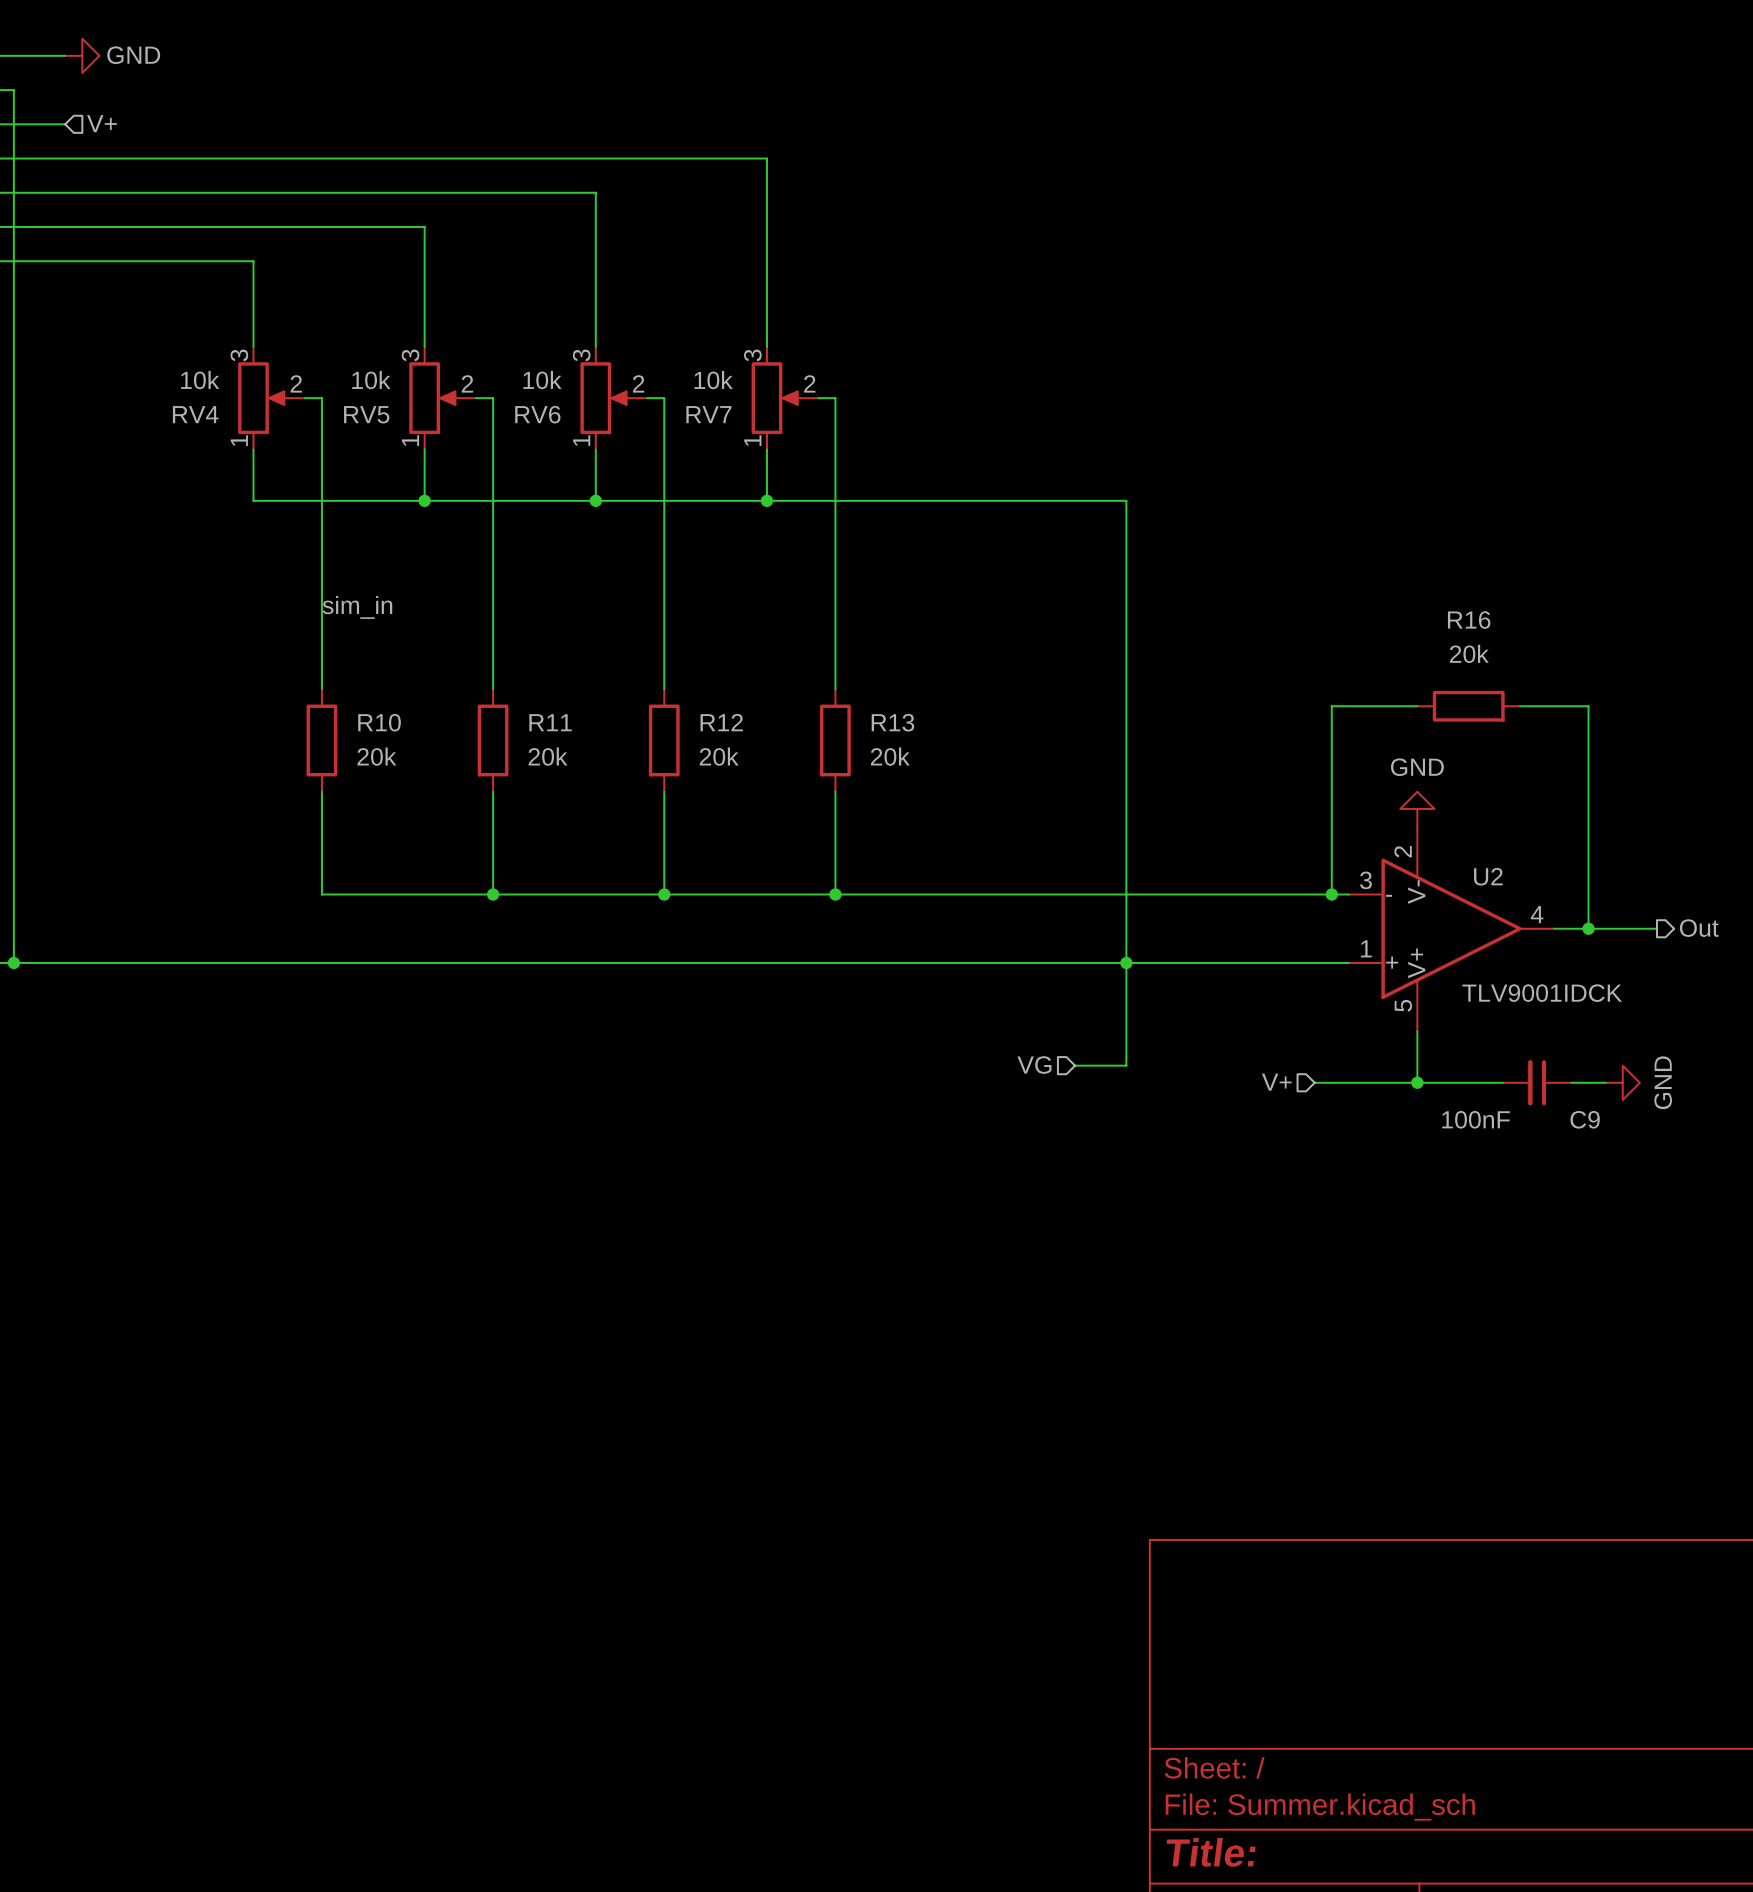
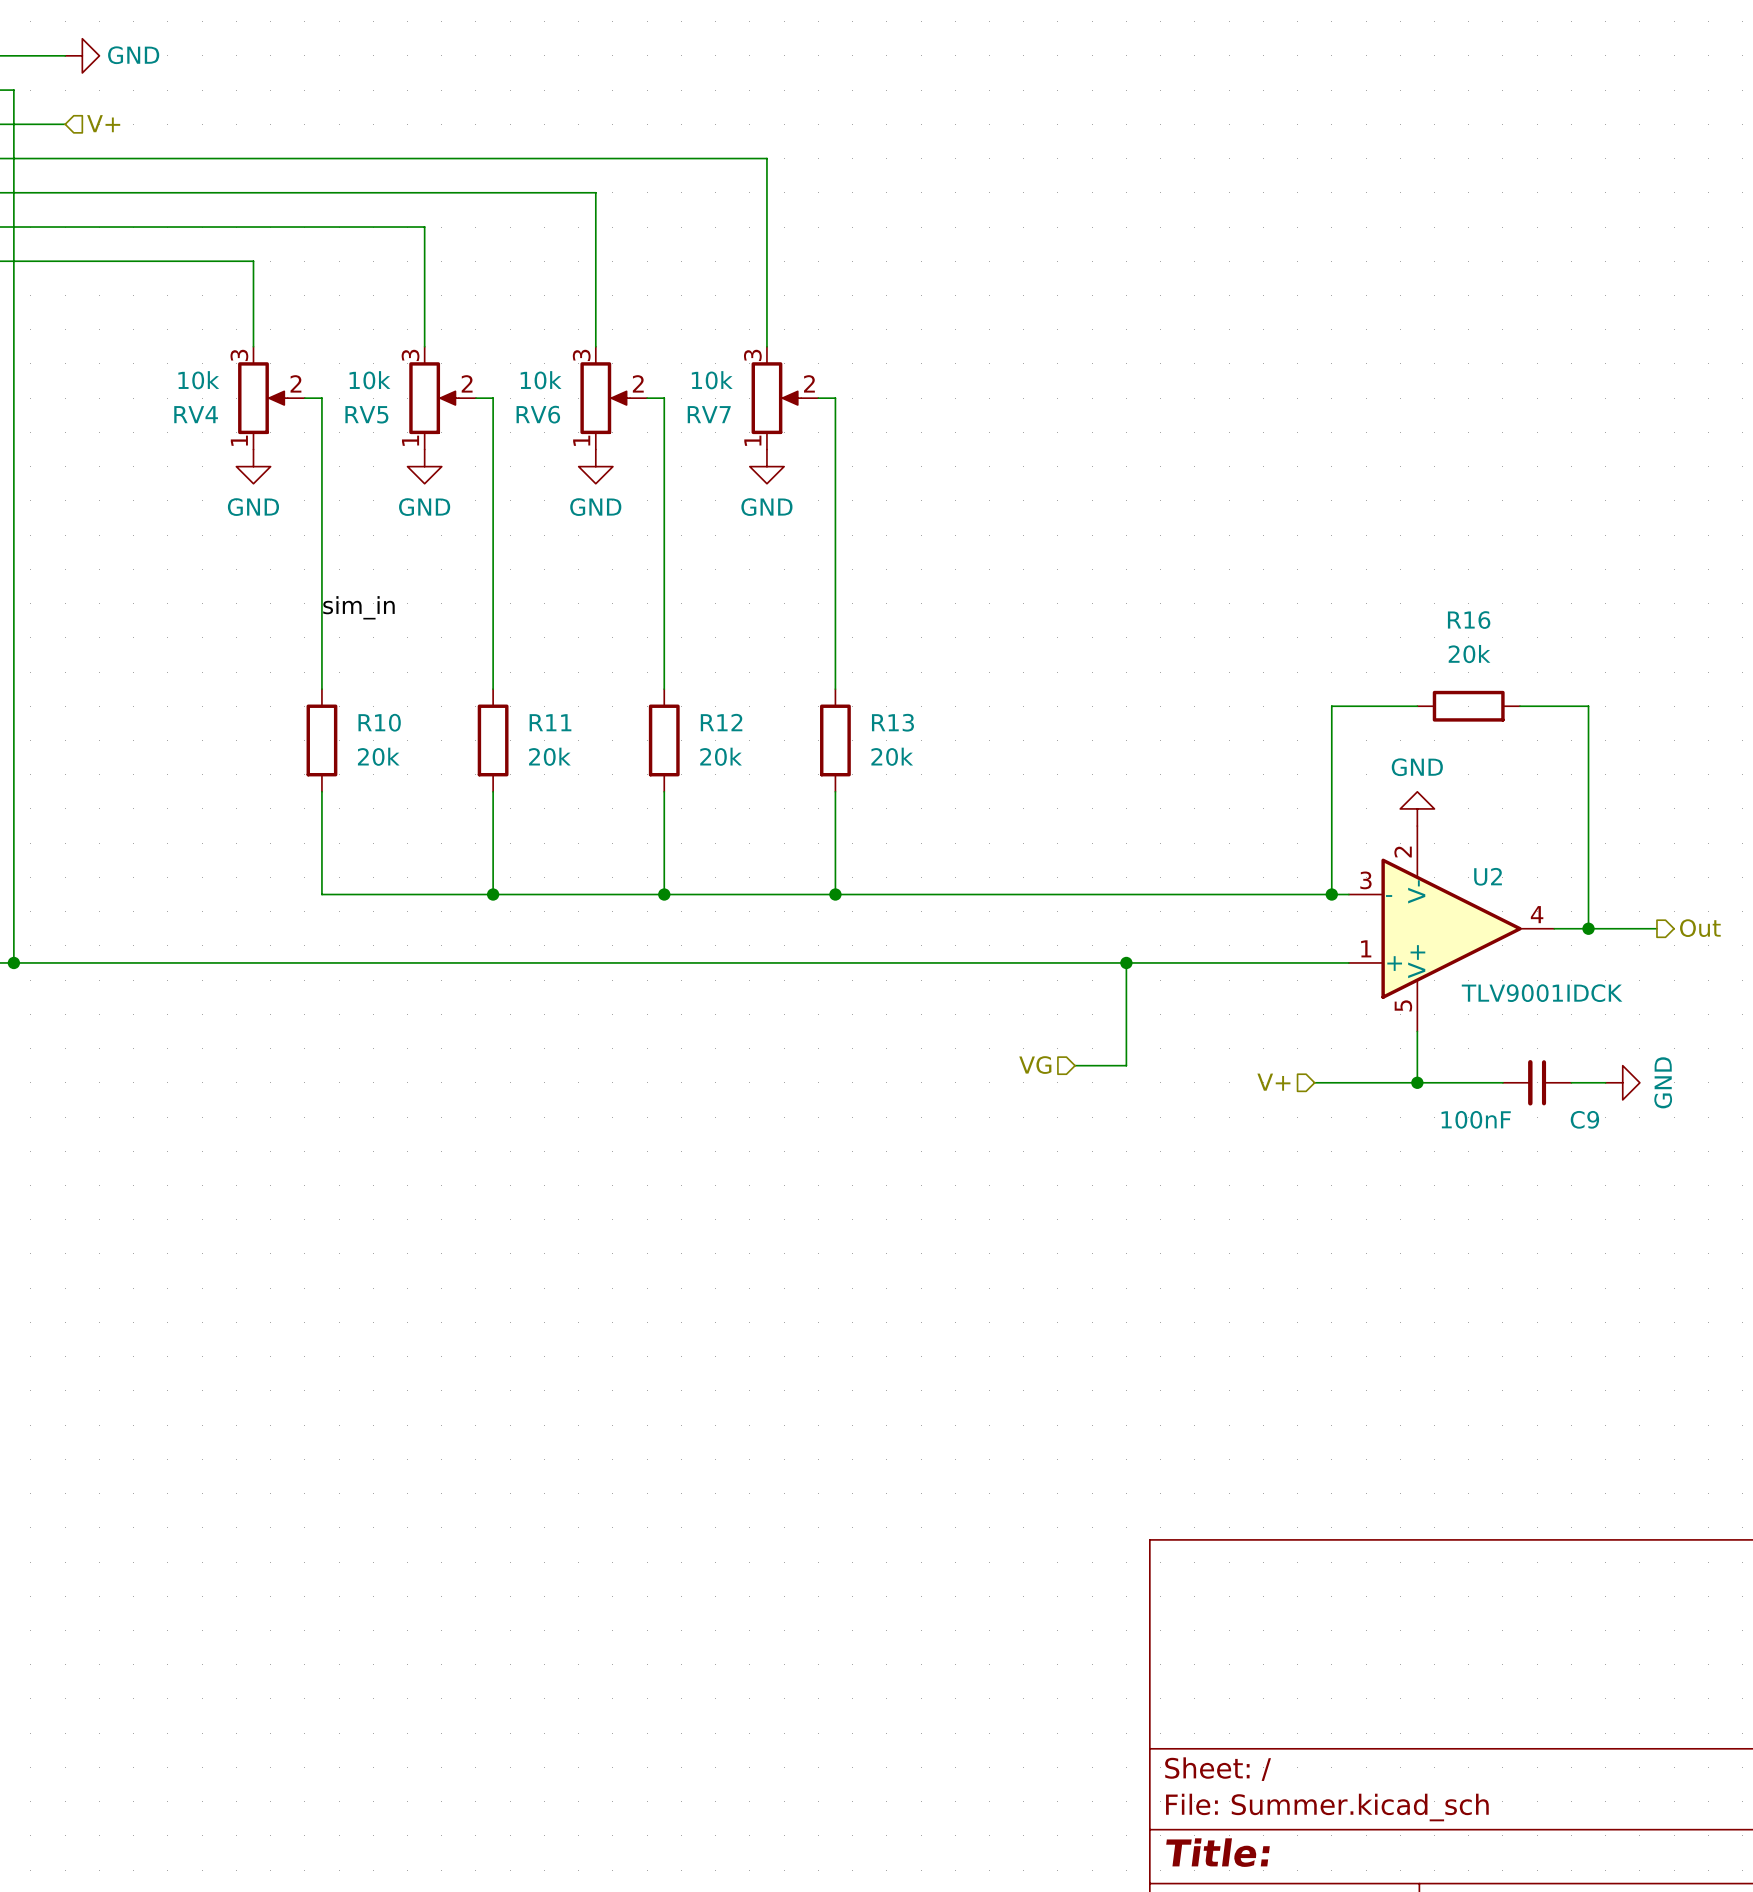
wire: (253, 449) (253, 500) (1126, 500) (1126, 962) -> none
wire: (424, 449) (424, 500) -> none
wire: (595, 449) (595, 500) -> none
wire: (766, 449) (766, 500) -> none
power symbol: none -> GND (253, 466)
power symbol: none -> GND (424, 466)
power symbol: none -> GND (595, 466)
power symbol: none -> GND (766, 466)
junction: (424, 500) -> none
junction: (595, 500) -> none
junction: (766, 500) -> none

